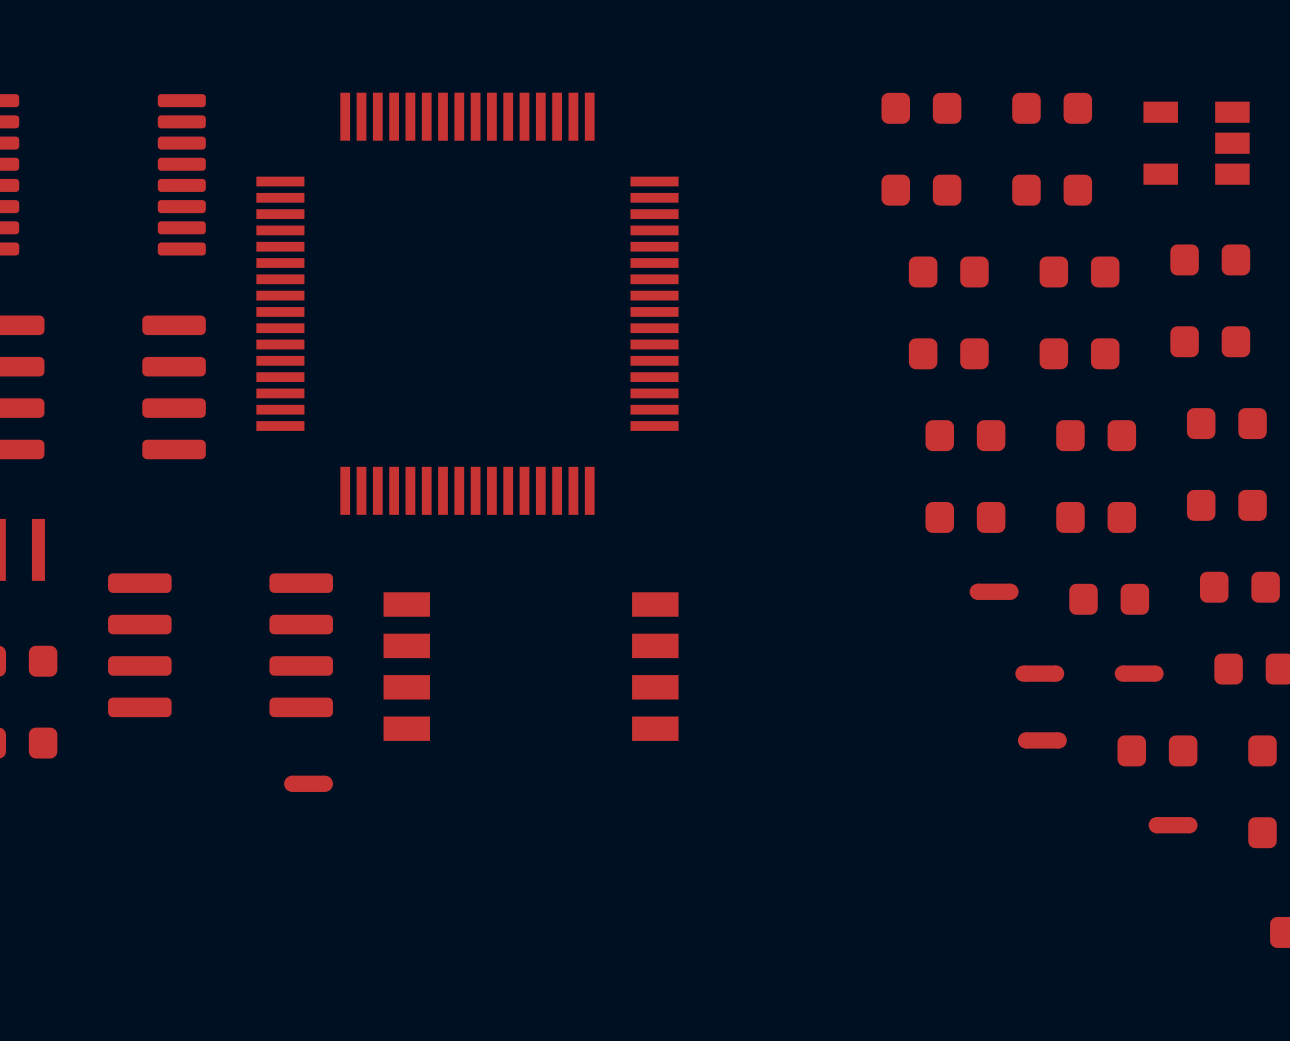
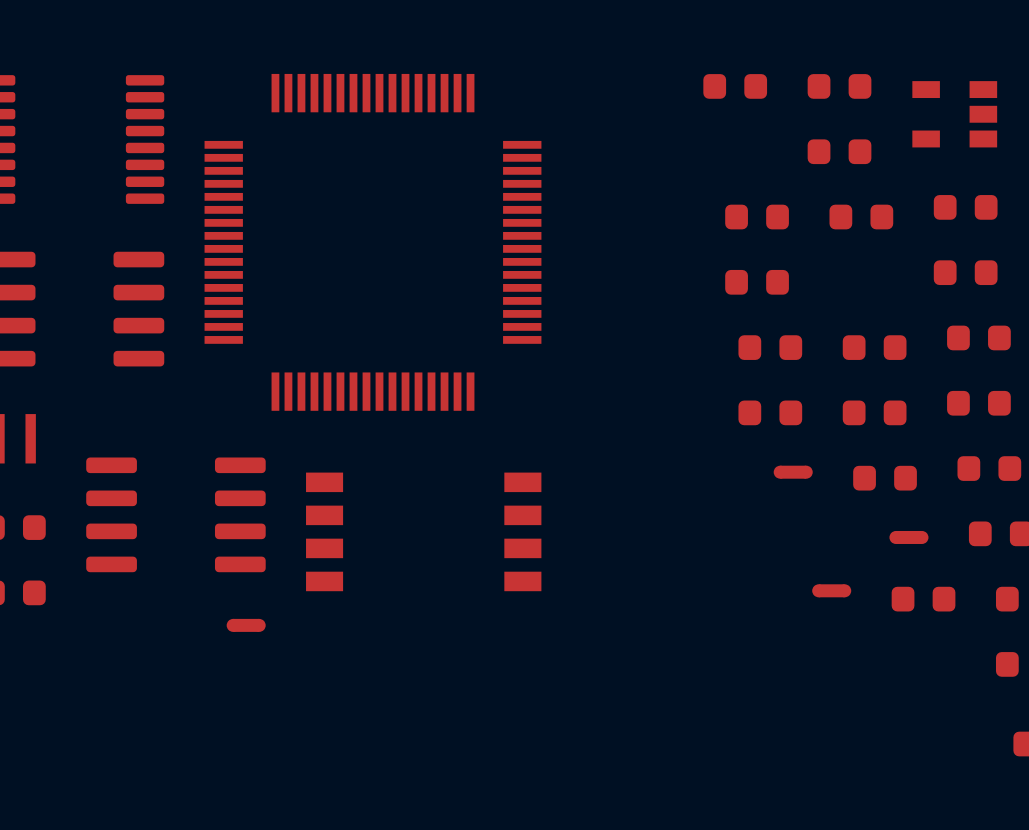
part: (921, 190) -> none
part: (1079, 353) -> none
part: (1039, 673) -> none
part: (1173, 825) -> none

